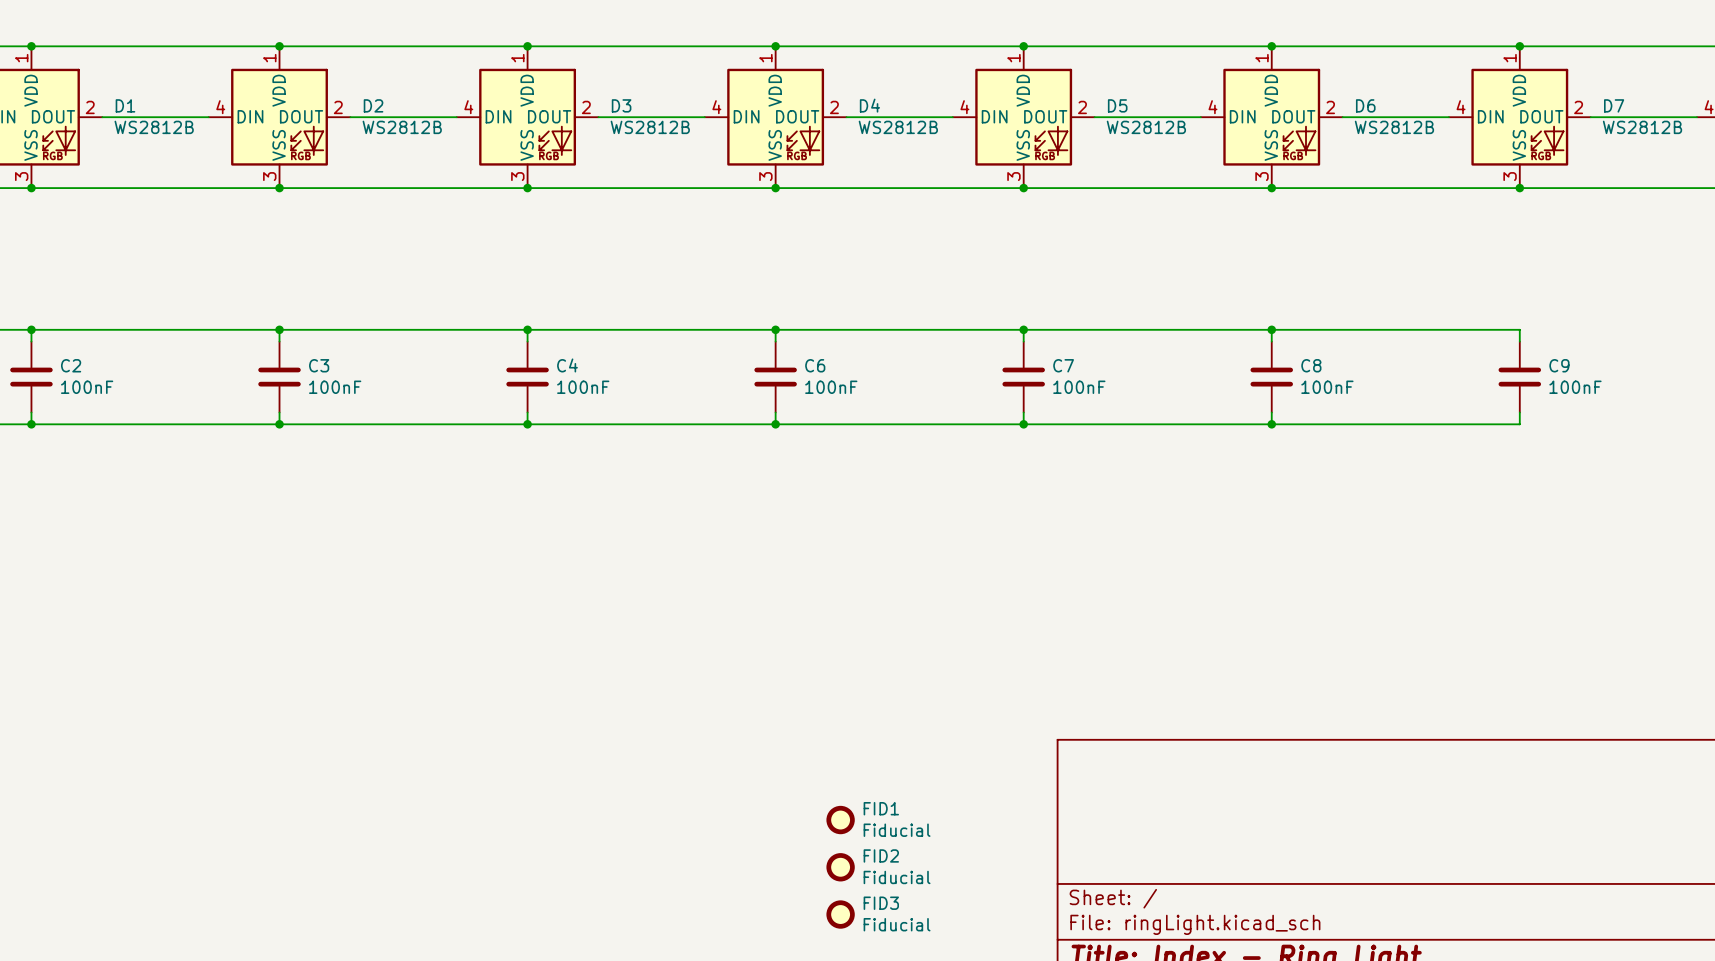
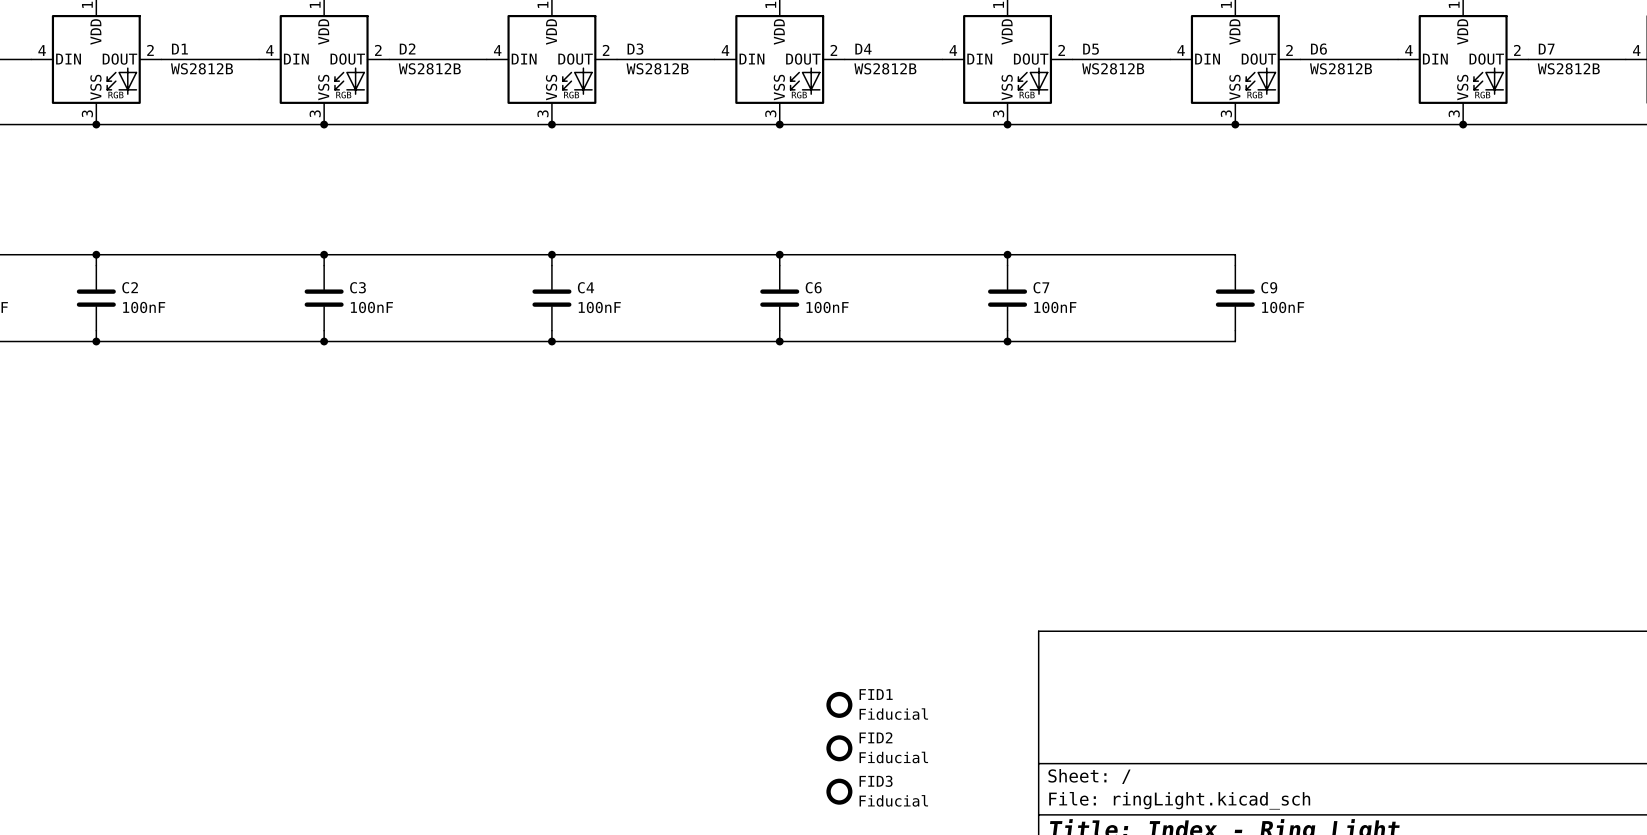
wire: (1271, 329) (1519, 329) (1519, 341) -> none
junction: (1271, 329) -> none
C8 name: C8 (1311, 365) -> C9 (1269, 287)
C9: 100nF (1519, 377) -> none
wire: (1519, 412) (1519, 424) (1271, 424) -> none
junction: (1271, 424) -> none

